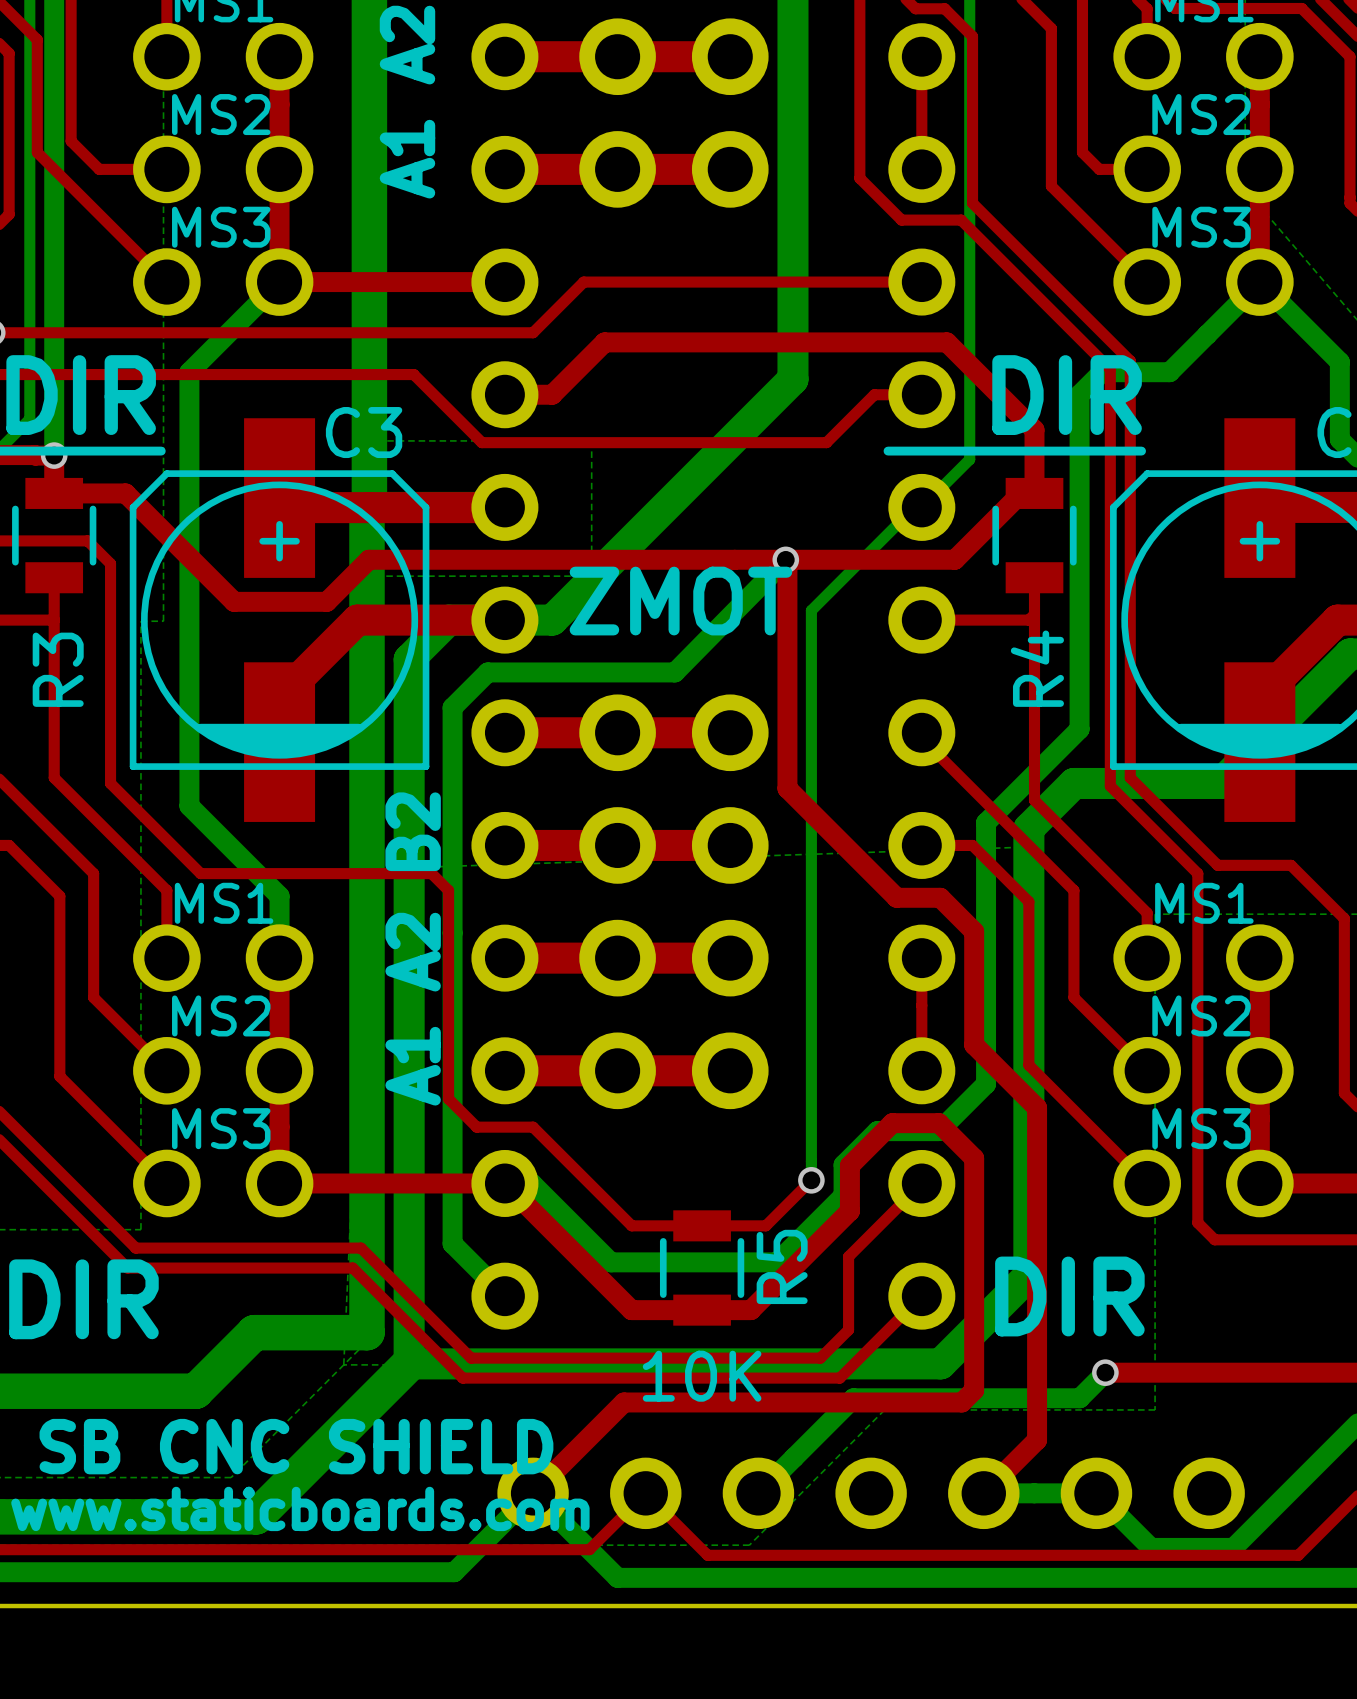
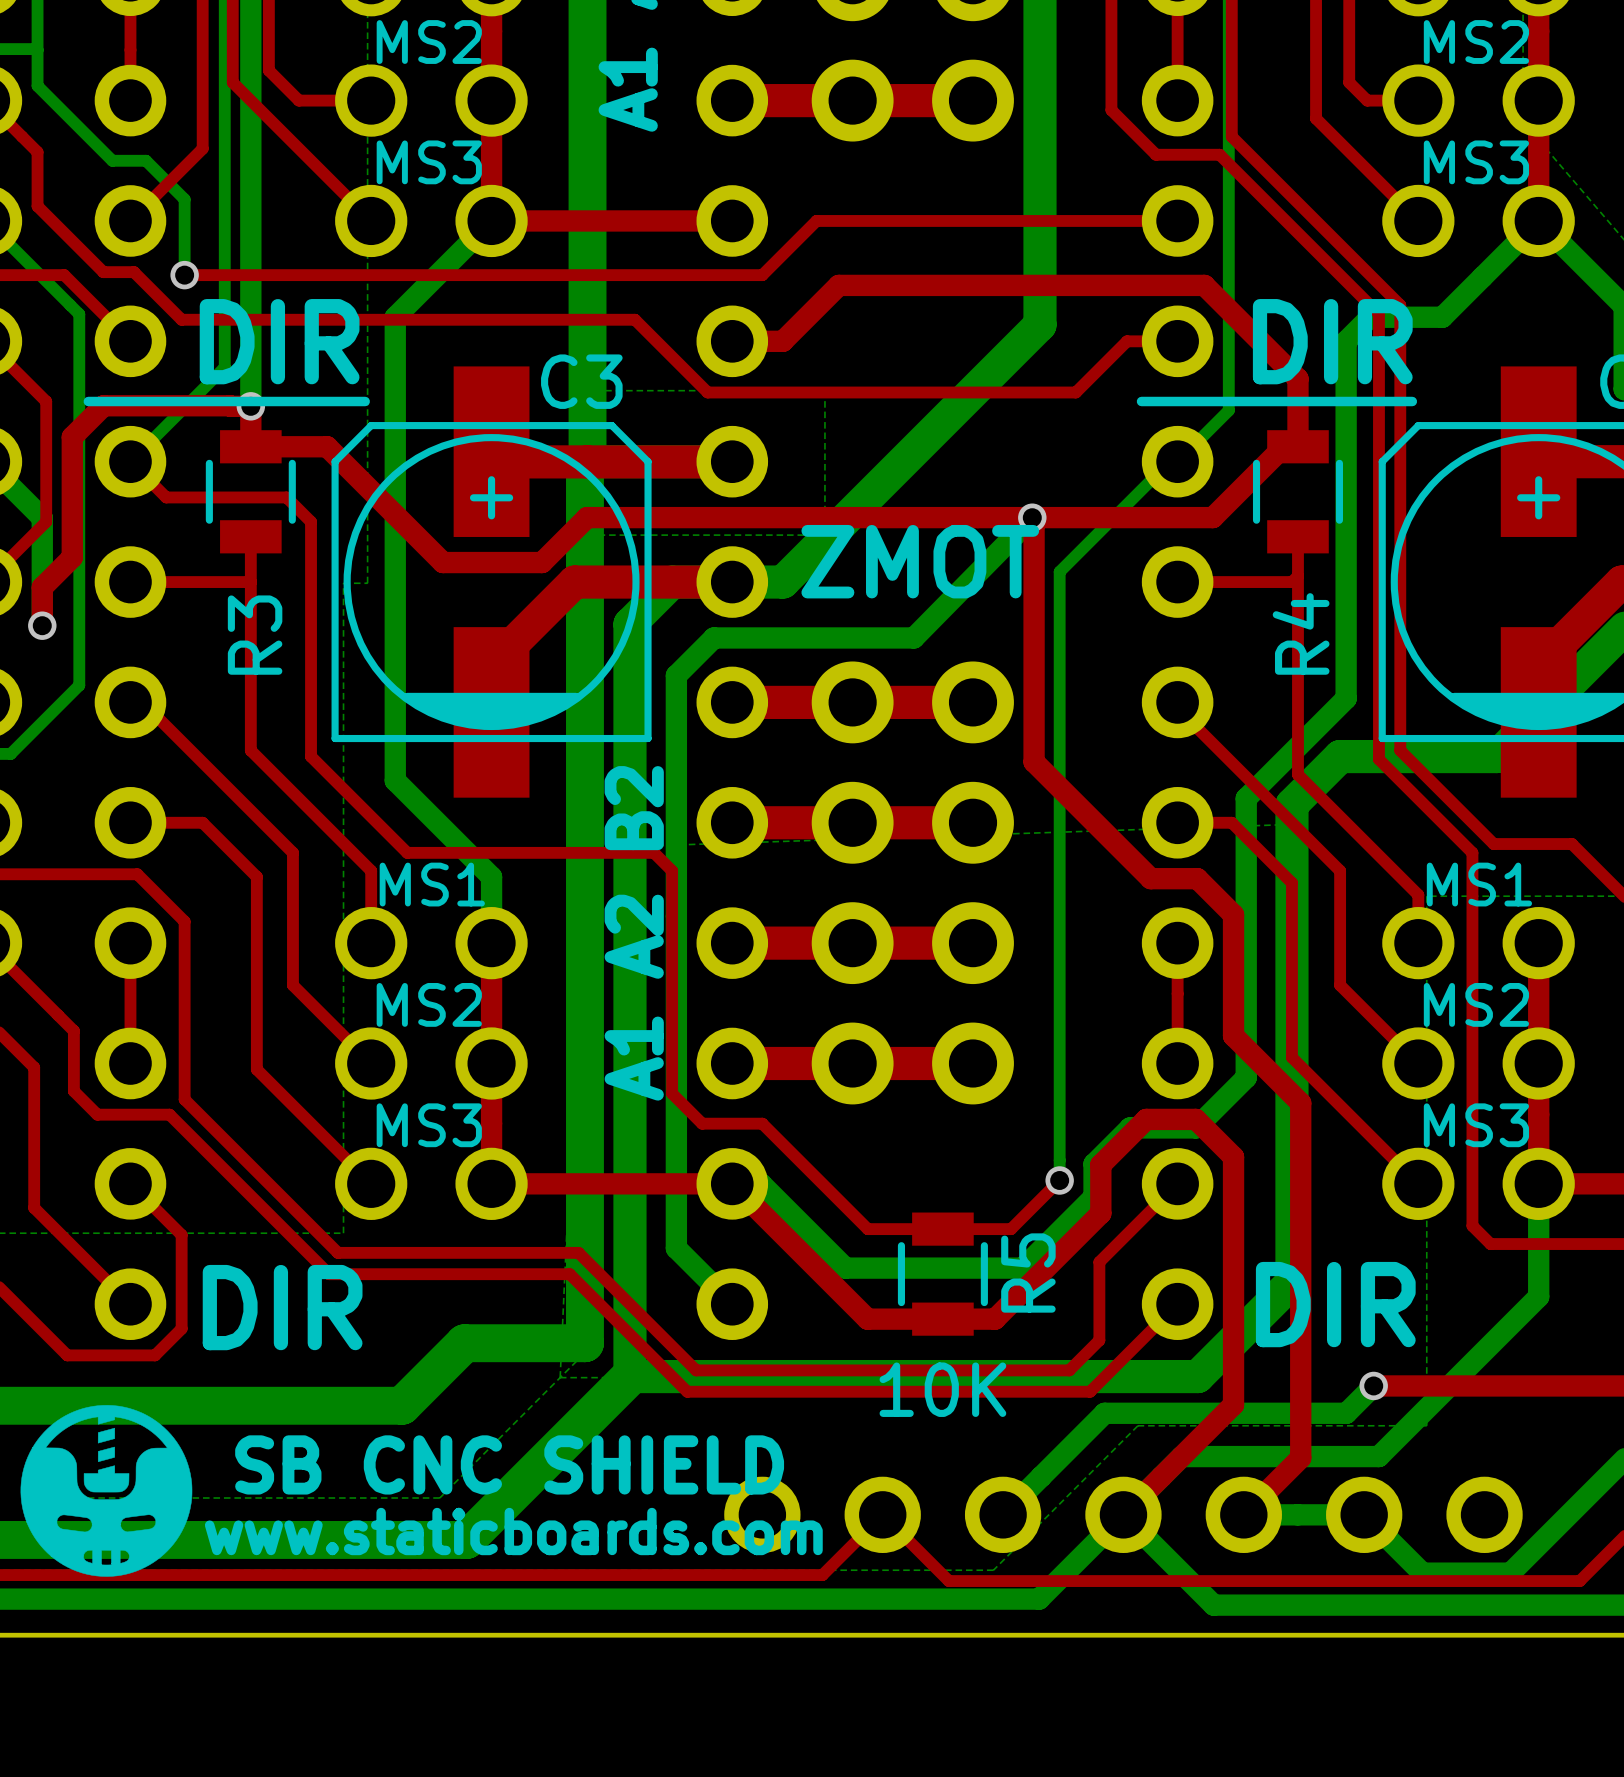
bottom track: none -> (1538, 1183) (1538, 1296) (1378, 1456) (1181, 1456) (1039, 1599) (678, 1599)
top track: (961, 1402) (623, 1402) (533, 1493) -> (1220, 1417) (1123, 1514)
bottom track: (454, 1572) (533, 1493) (617, 1577) (955, 1577) -> (1123, 1514) (1213, 1605)

